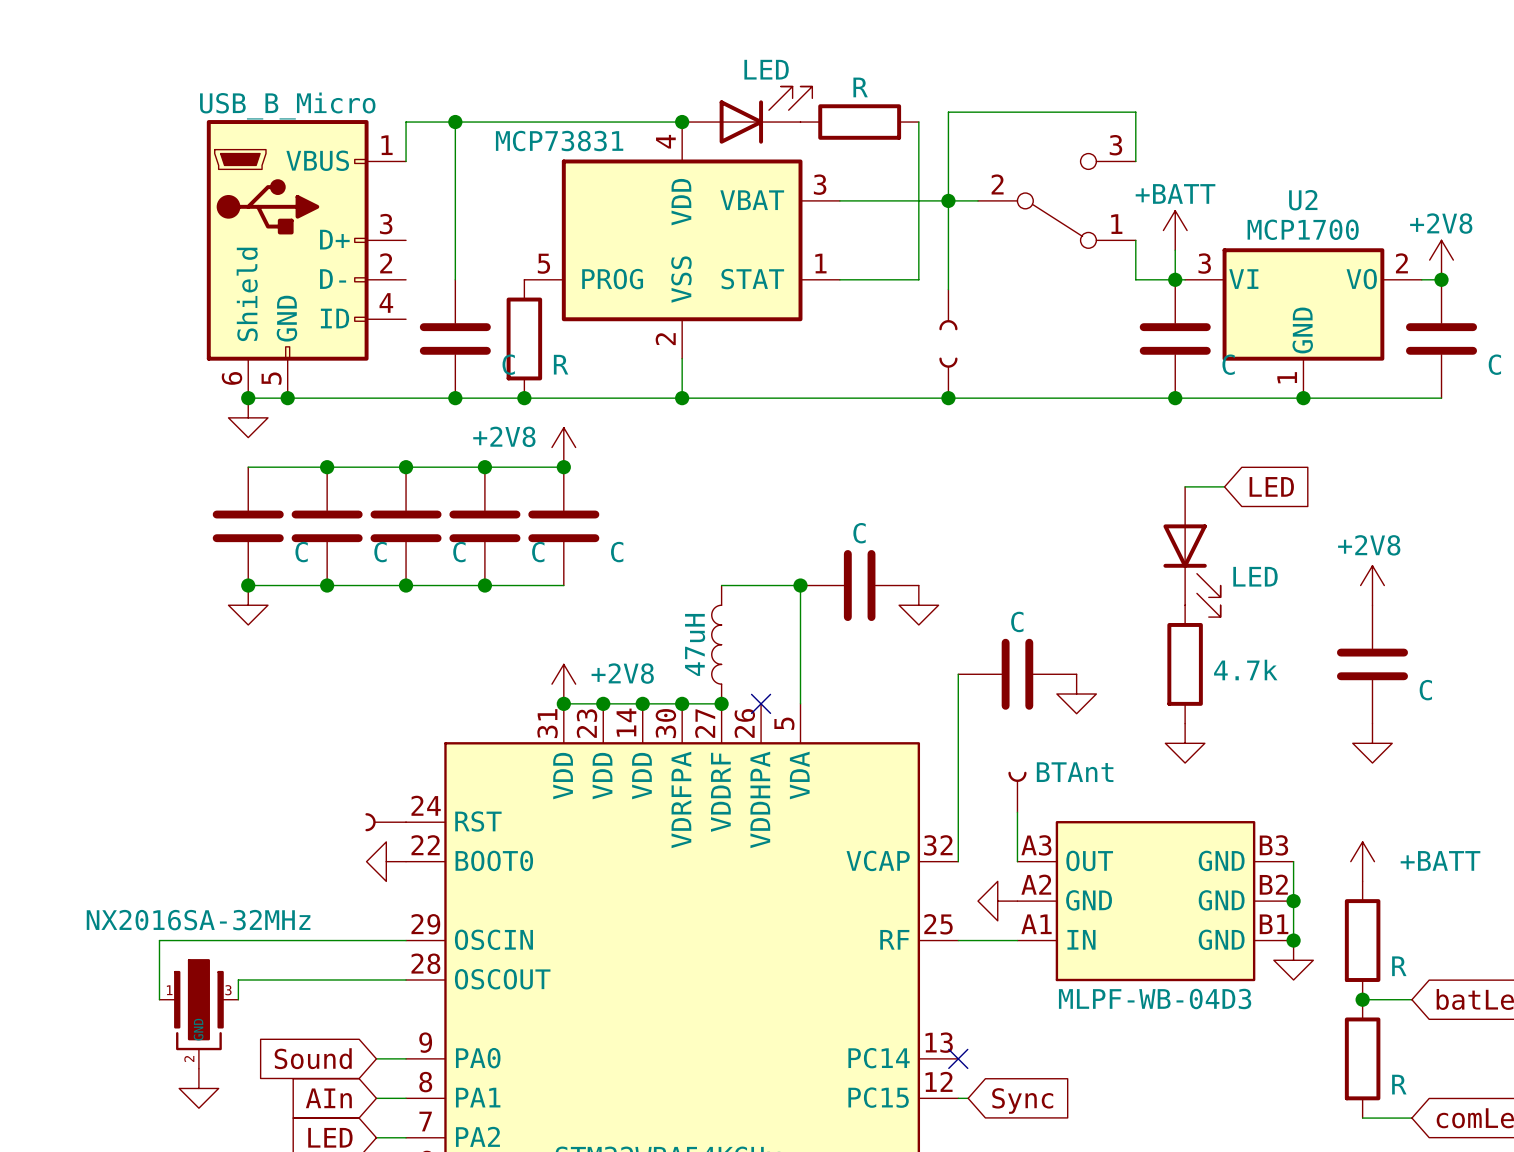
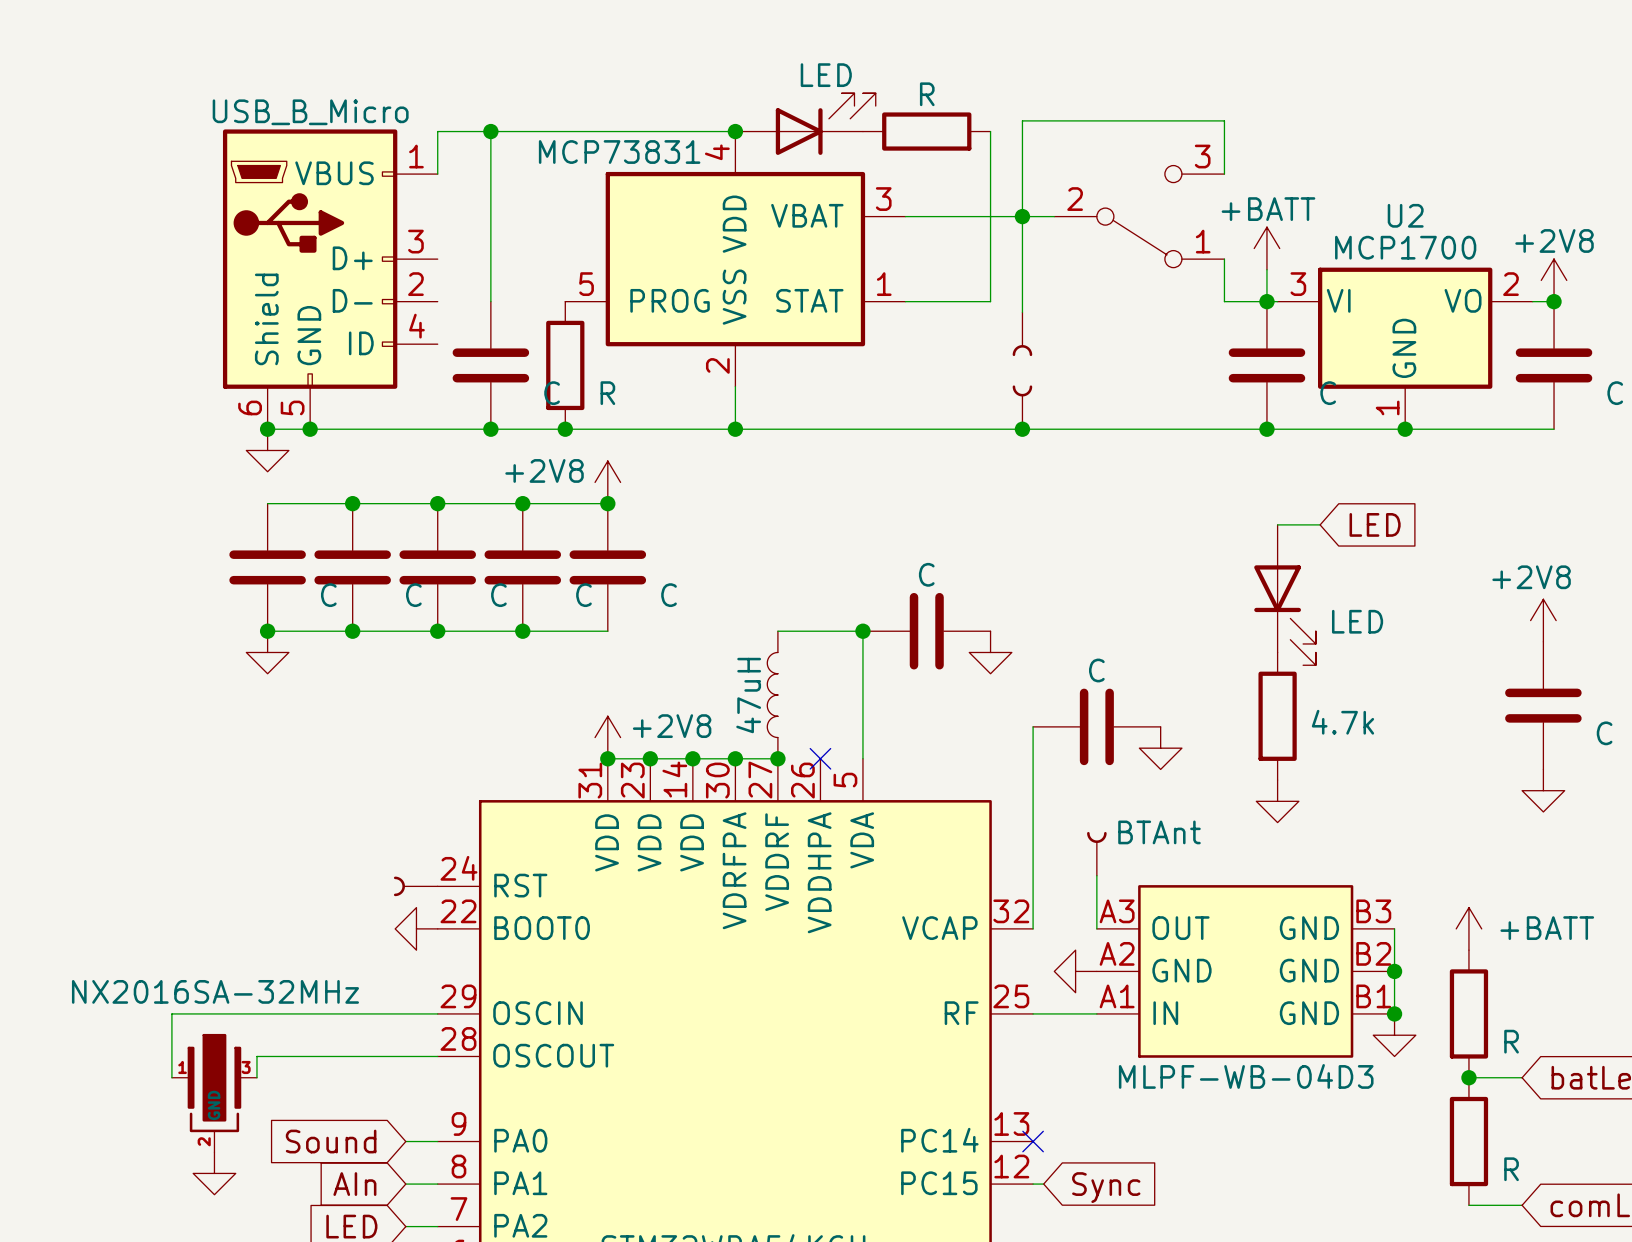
power symbol position: +2V8 (1372, 585) -> +2V8 (1543, 620)
part position: (1372, 664) -> (1543, 705)
power symbol position: (1372, 743) -> (1543, 790)

